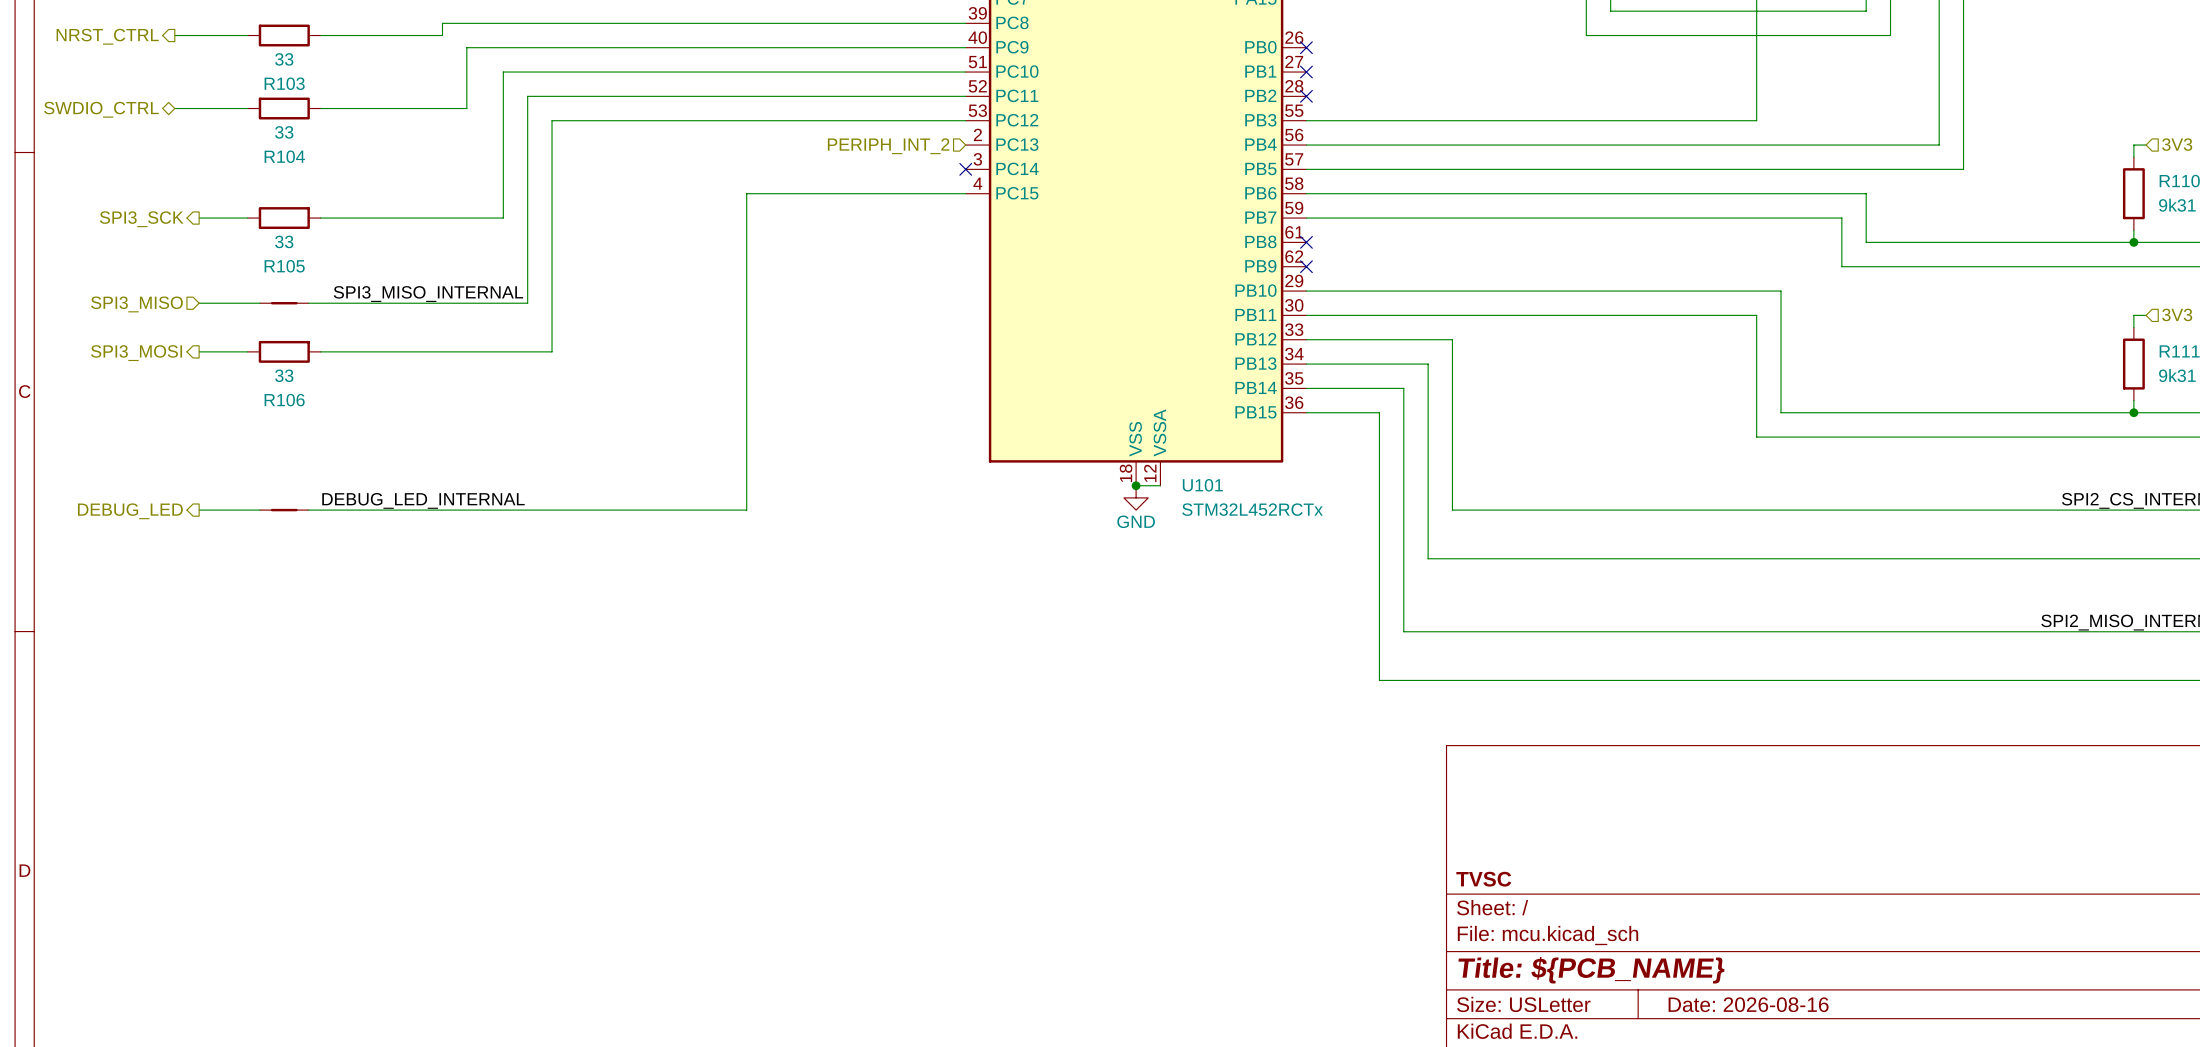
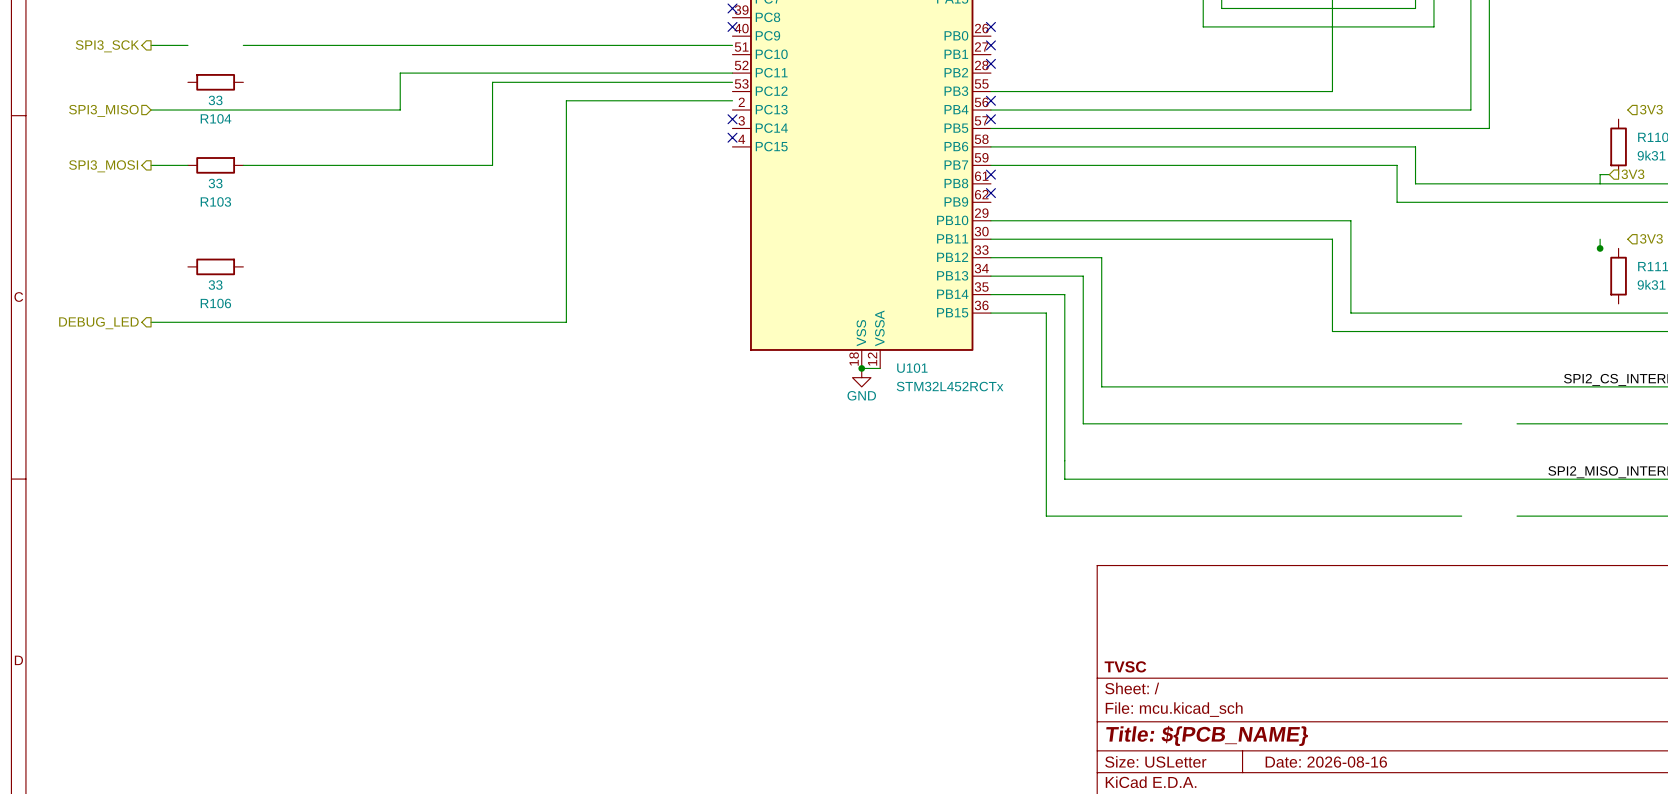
no-connect mark: none -> (732, 8)
wire: (965, 23) (442, 23) (442, 35) (320, 35) -> none
wire: (174, 35) (247, 35) -> none
R103: 33 (284, 35) -> none
no-connect mark: none -> (732, 26)
no-connect mark: none -> (990, 26)
hierarchical label: NRST_CTRL (107, 36) -> none
wire: (965, 47) (466, 47) (466, 108) (320, 108) -> none
no-connect mark: (1306, 47) -> none
wire: none -> (151, 45) (187, 45)
wire: none -> (243, 45) (732, 45)
no-connect mark: none -> (990, 45)
hierarchical label: none -> SPI3_SCK (107, 46)
wire: (965, 72) (503, 72) (503, 218) -> (732, 82) (492, 82) (492, 165) (381, 165)
no-connect mark: (1306, 72) -> none
no-connect mark: none -> (990, 63)
no-connect mark: (1306, 96) -> none
wire: (174, 108) (247, 108) -> none
hierarchical label: SWDIO_CTRL (101, 109) -> none
wire: (965, 120) (552, 120) (552, 351) (320, 351) -> none
no-connect mark: none -> (990, 100)
wire: (527, 145) (527, 303) (308, 303) -> (400, 110) (151, 110)
wire: (2146, 145) (2133, 145) (2133, 157) -> (1609, 174) (1600, 174) (1600, 183)
hierarchical label: PERIPH_INT_2 (888, 146) -> none
no-connect mark: none -> (732, 119)
no-connect mark: none -> (990, 119)
no-connect mark: (965, 169) -> none
no-connect mark: none -> (732, 137)
wire: (746, 193) (965, 193) -> (566, 146) (566, 100) (732, 100)
hierarchical label: SPI3_SCK (141, 219) -> SPI3_MOSI (103, 166)
hierarchical label: none -> 3V3 (1632, 174)
no-connect mark: none -> (990, 174)
no-connect mark: (1306, 242) -> none
junction: (2133, 242) -> none
no-connect mark: none -> (990, 193)
R105 name: R105 (284, 266) -> R103 (215, 201)
no-connect mark: (1306, 266) -> none
label: SPI3_MISO_INTERNAL (428, 294) -> none
wire: (199, 303) (259, 303) -> none
part: (284, 303) -> none
hierarchical label position: SPI3_MISO (136, 304) -> SPI3_MISO (103, 110)
wire: (2146, 315) (2133, 315) (2133, 327) -> none
junction: none -> (1600, 248)
wire: (199, 351) (247, 351) -> none
hierarchical label: SPI3_MOSI (136, 353) -> none
wire: (2133, 400) (2133, 412) -> (1600, 239) (1600, 248)
junction: (2133, 412) -> none
wire: (746, 424) (746, 510) (308, 510) -> (566, 322) (151, 322)
label: DEBUG_LED_INTERNAL (423, 500) -> none
wire: (199, 510) (259, 510) -> none
part: (284, 510) -> none
hierarchical label position: DEBUG_LED (130, 511) -> DEBUG_LED (98, 323)
wire: (1927, 558) (2000, 558) -> none
wire: (1927, 680) (2000, 680) -> none

